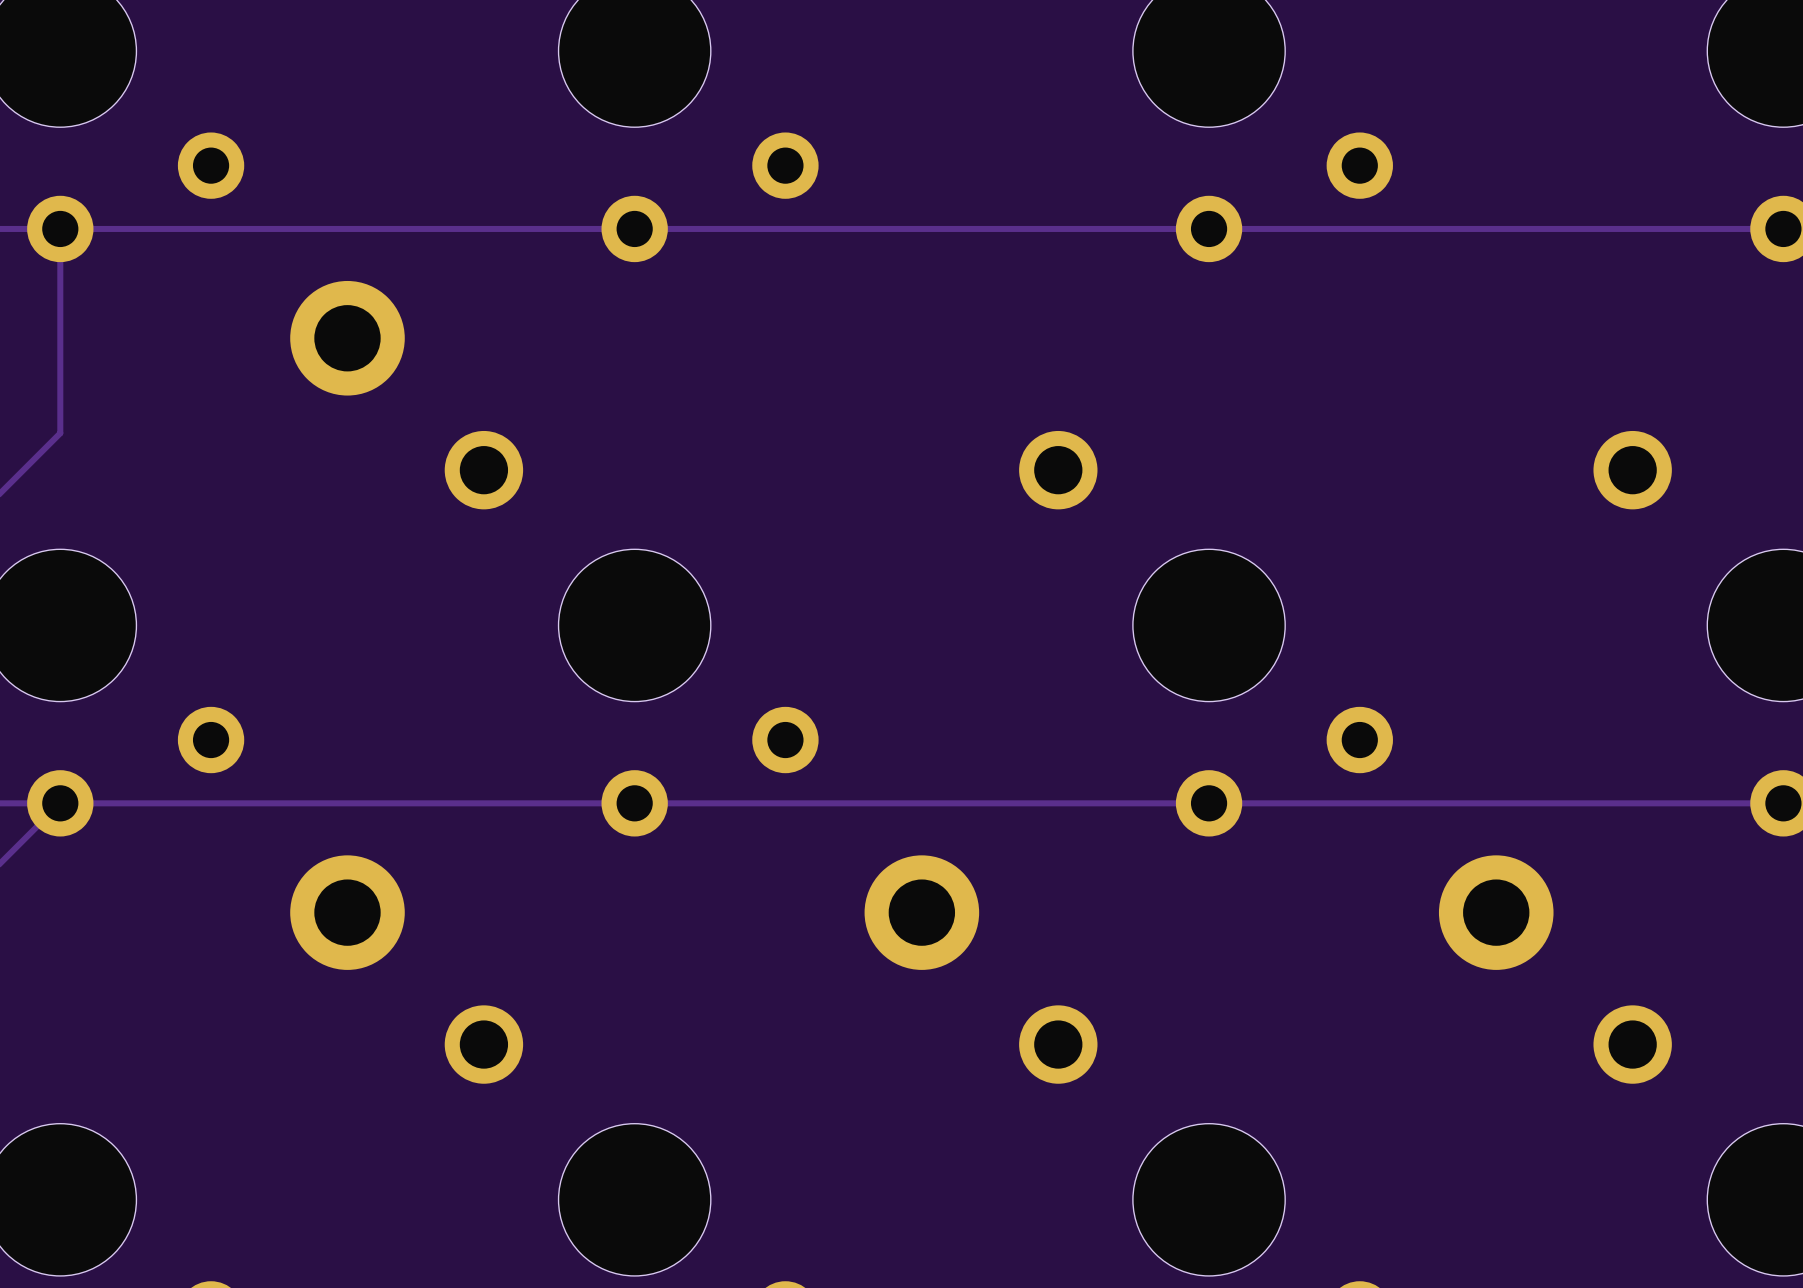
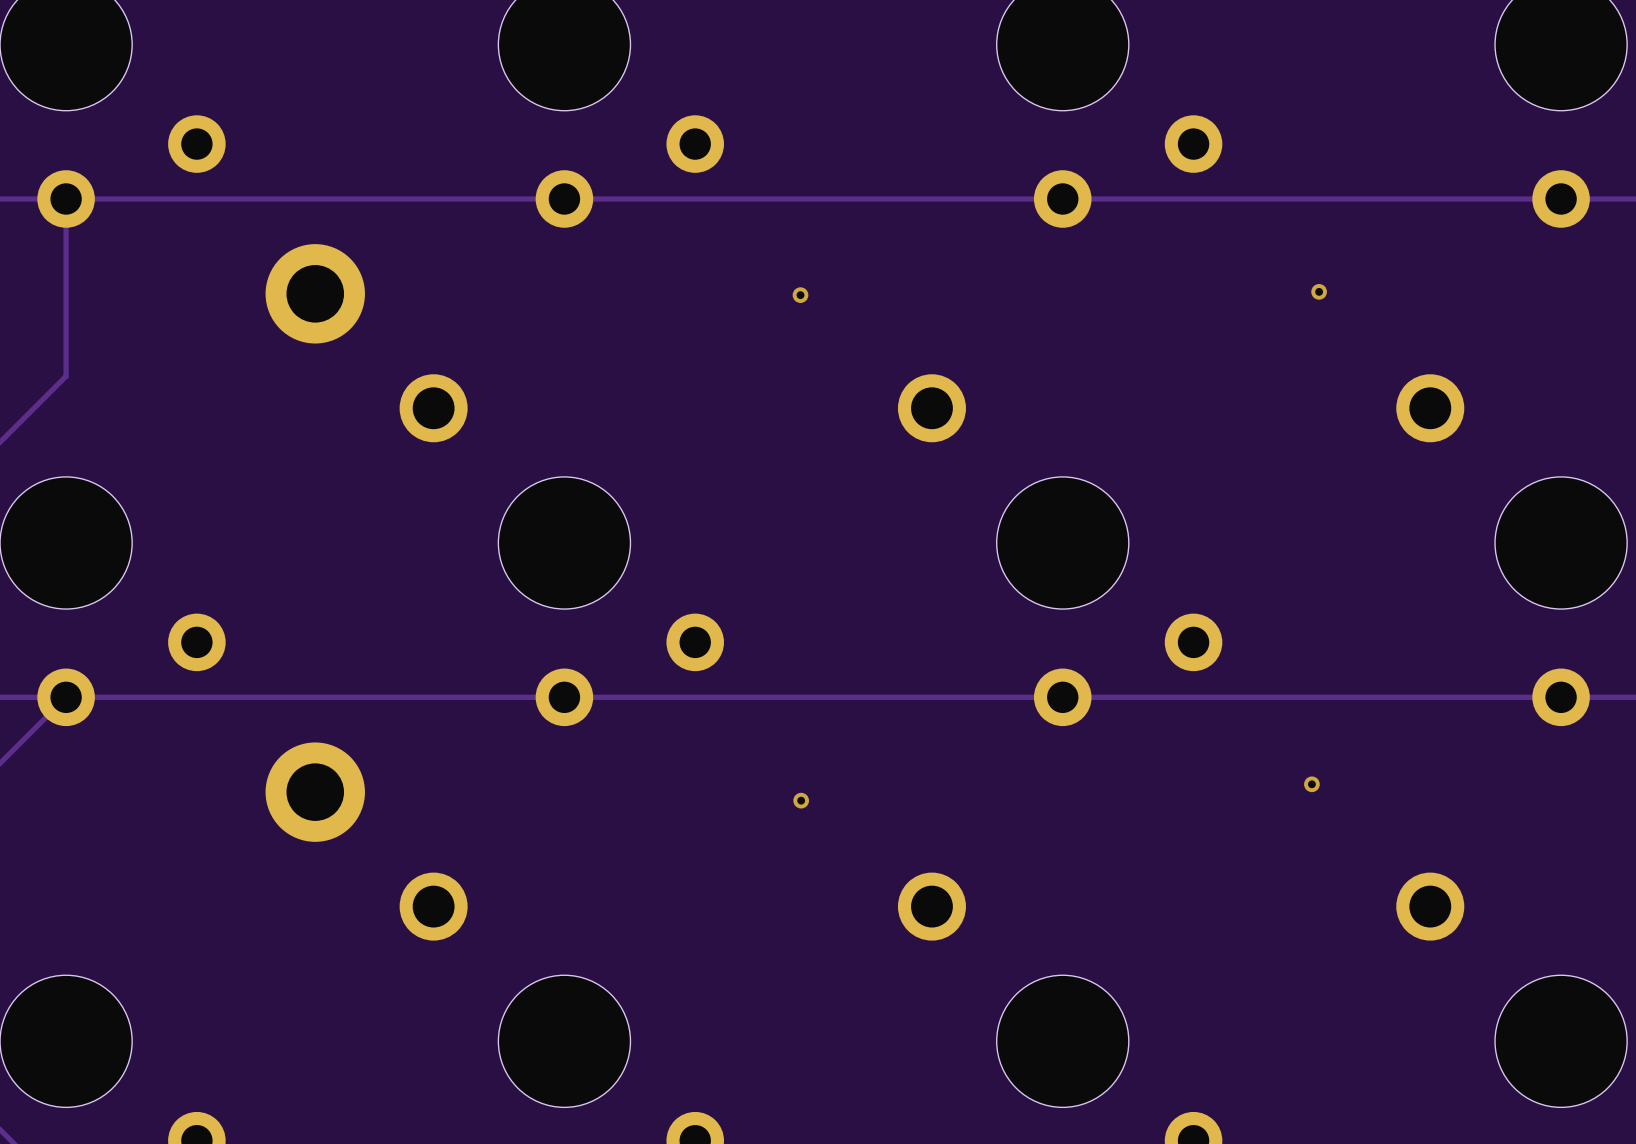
via: none -> (1319, 291)
via: none -> (800, 295)
via: none -> (1311, 784)
part: (921, 912) -> none
part: (1496, 912) -> none
via: none -> (801, 800)

